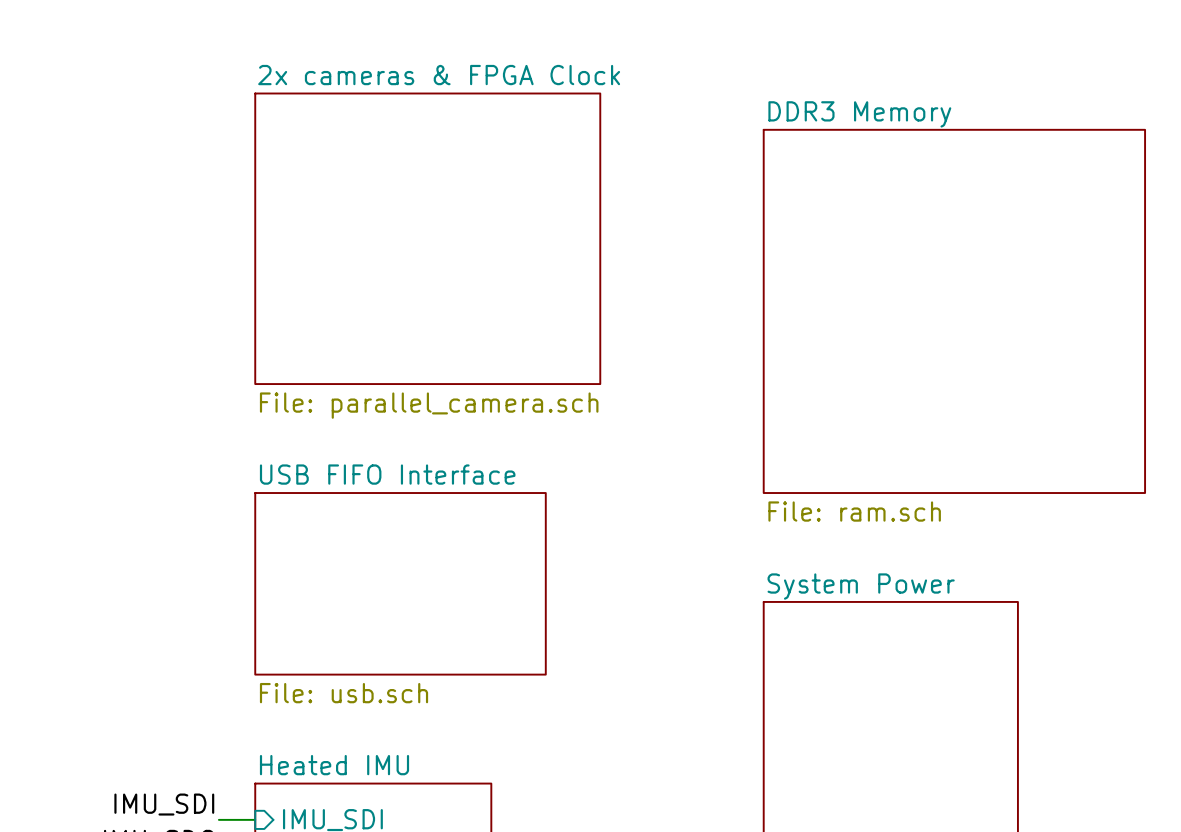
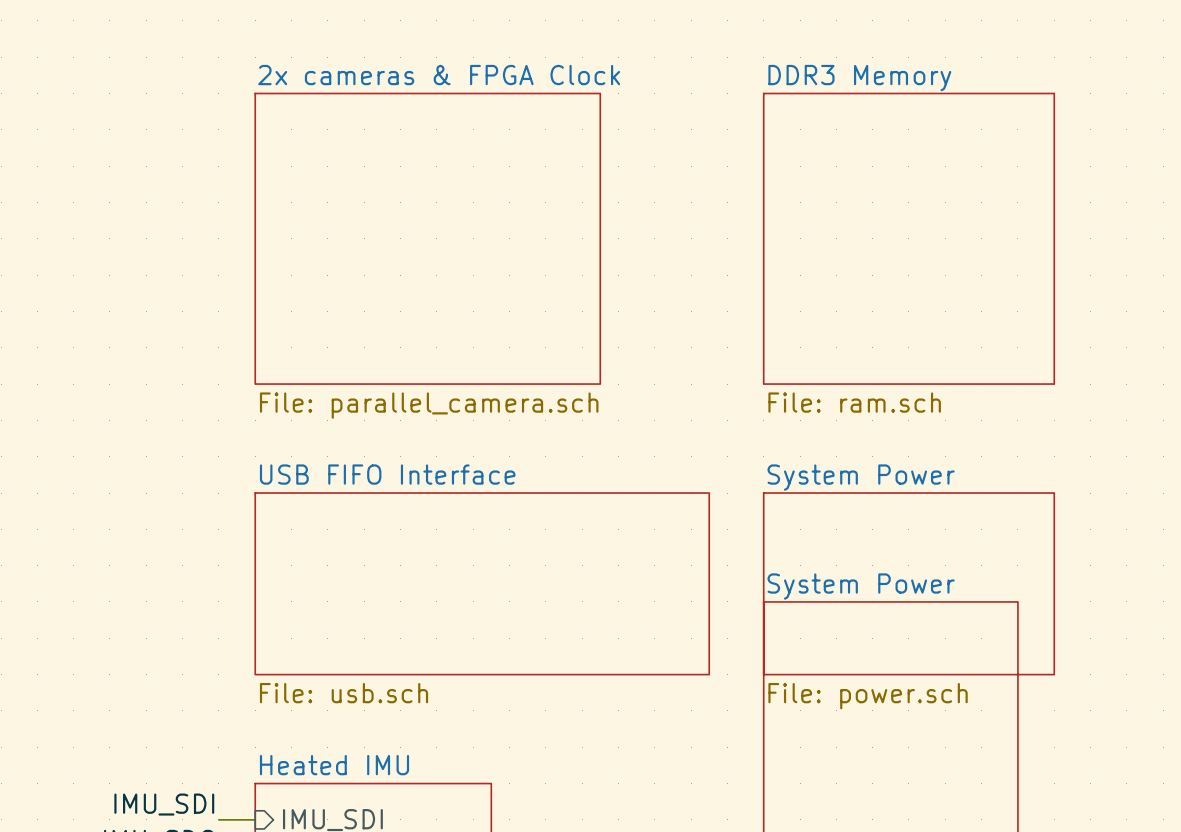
sheet DDR3 Memory name position: DDR3 Memory (859, 114) -> DDR3 Memory (859, 78)
sheet DDR3 Memory shape: [763, 129, 1146, 494] -> [763, 93, 1055, 385]
sheet DDR3 Memory value position: File: ram.sch (854, 511) -> File: ram.sch (854, 402)
sheet USB FIFO Interface: File: usb.sch (400, 583) -> none
sheet USB FIFO Interface: none -> File: usb.sch (482, 583)
sheet System Power: none -> File: power.sch (908, 583)

